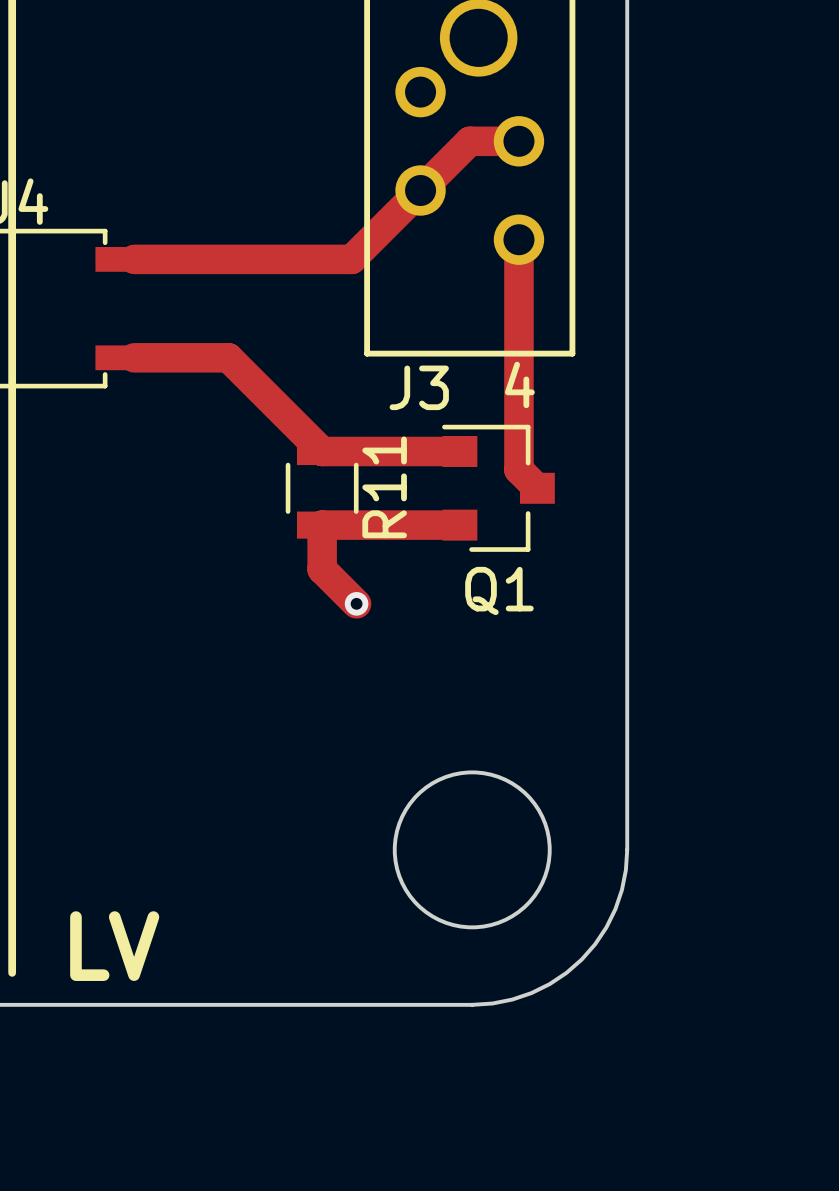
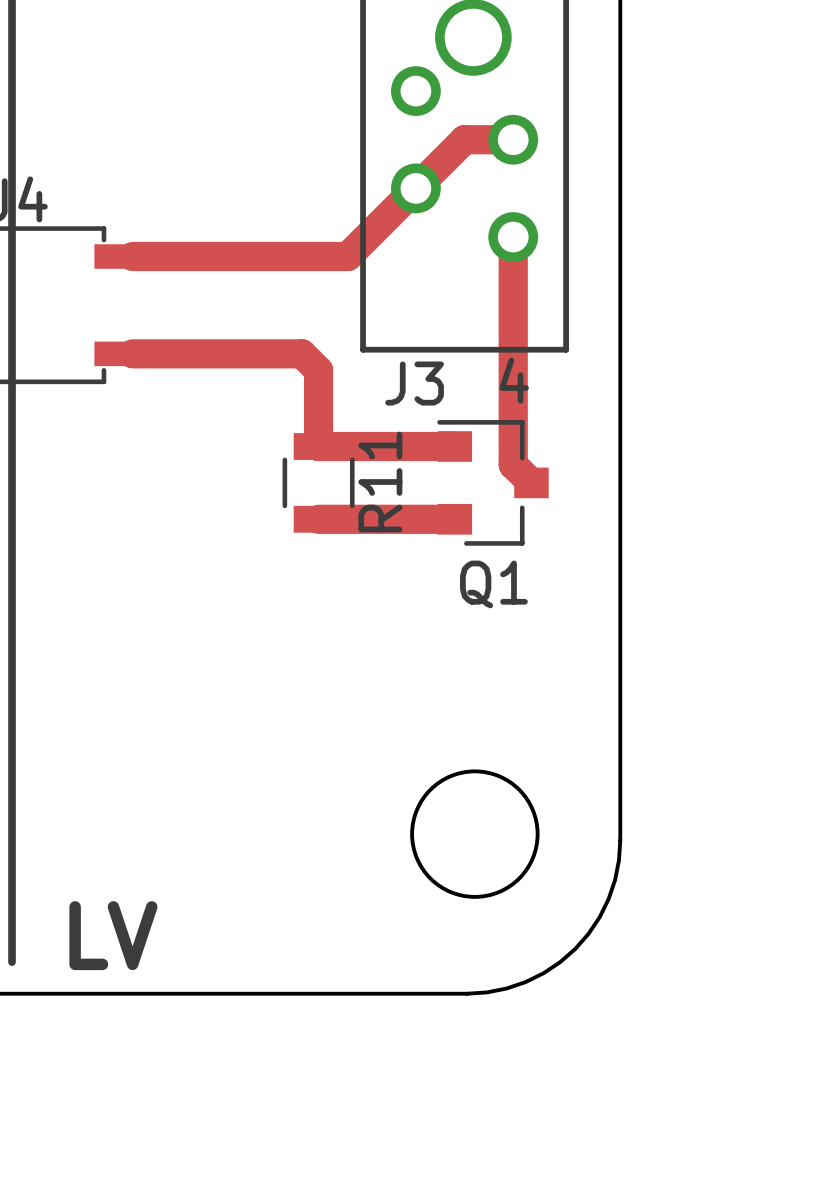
track: (228, 357) (322, 451) -> (225, 353) (301, 353) (318, 370) (318, 446)
track: (322, 525) (322, 569) (356, 603) -> none
via: (356, 603) -> none
round board edge size: [392, 770, 552, 930] -> [410, 769, 540, 899]

